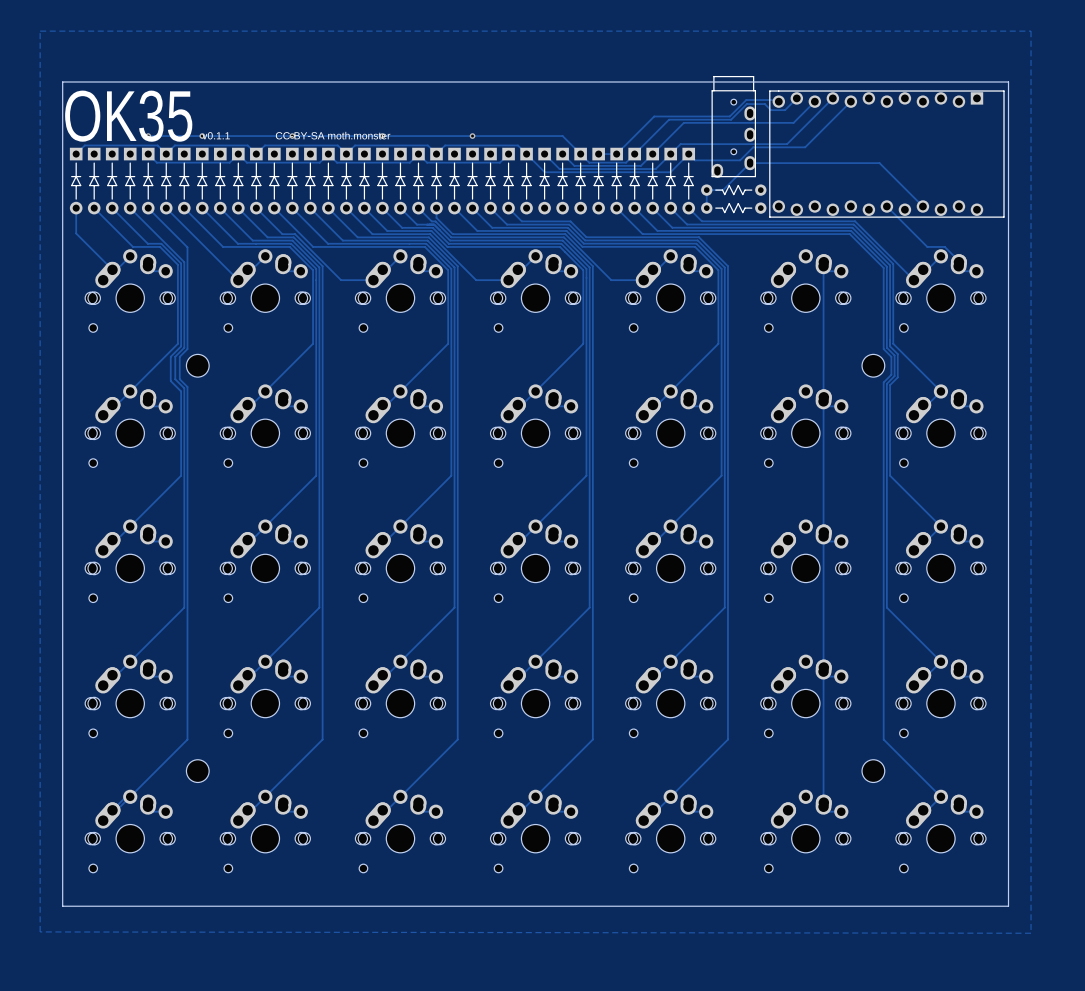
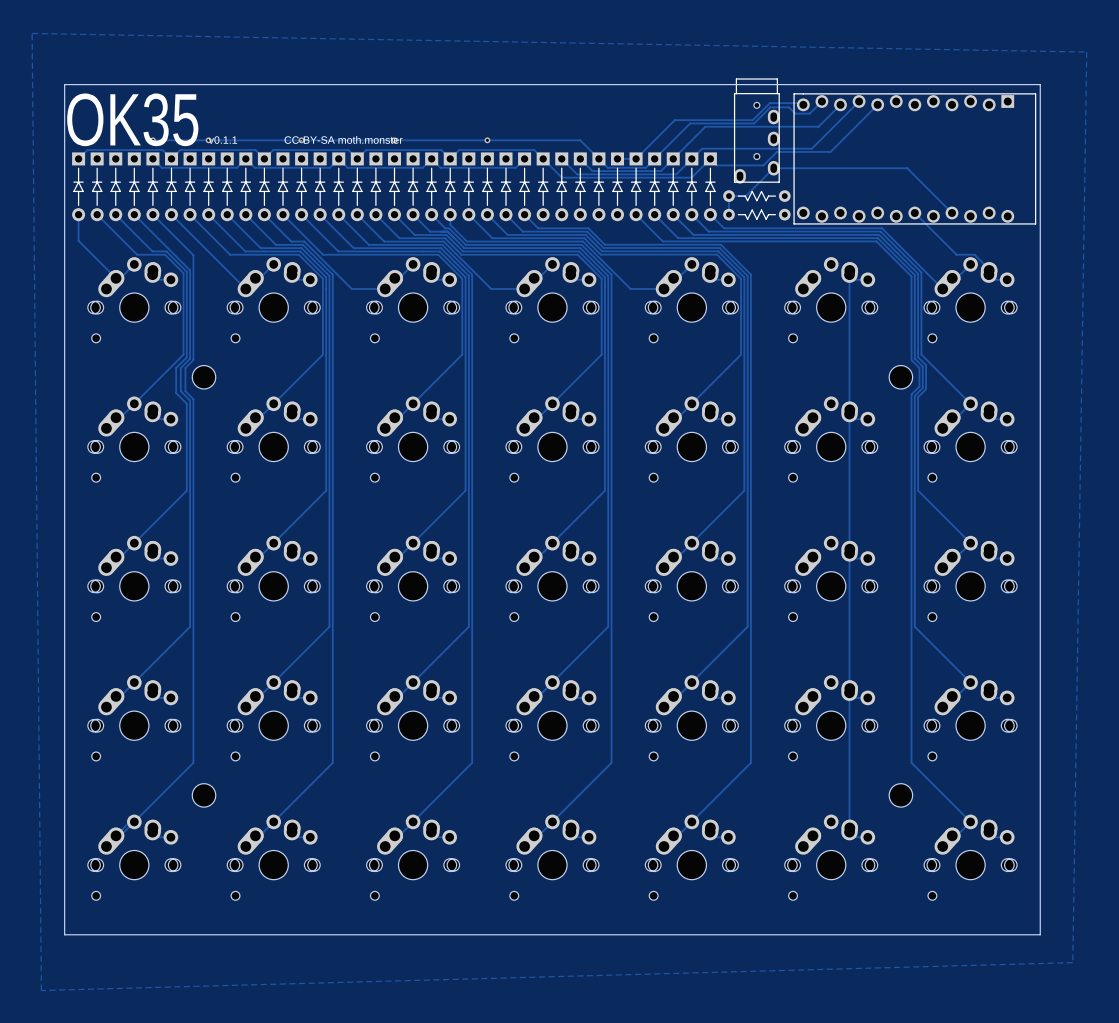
zone outline: (40, 31) (40, 931) (1031, 933) (1031, 31) (40, 31) -> (32, 33) (41, 990) (1072, 962) (1086, 52) (32, 33)

